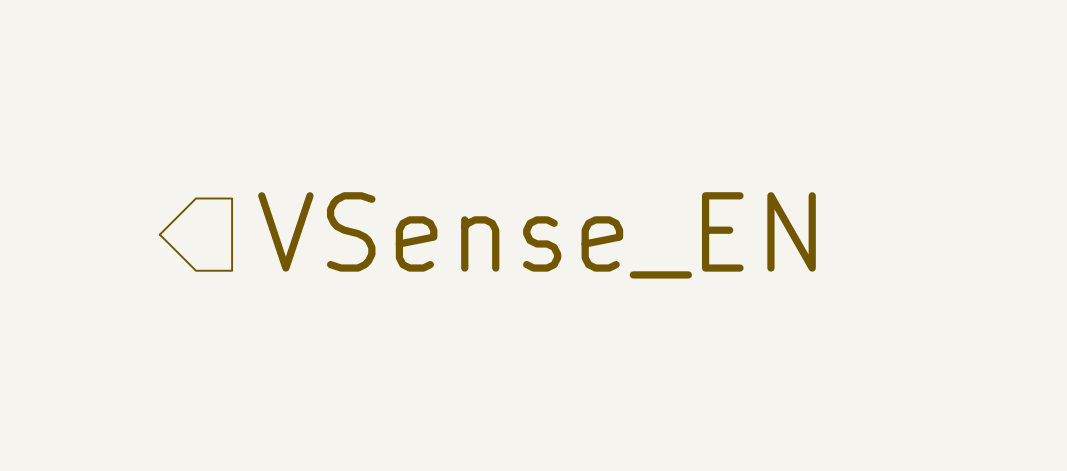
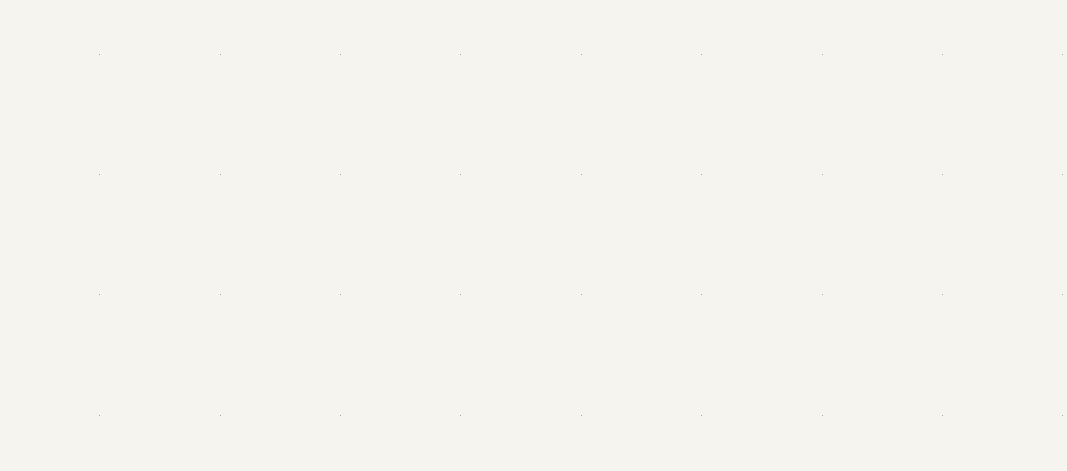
hierarchical label: VSense_EN (537, 235) -> none

